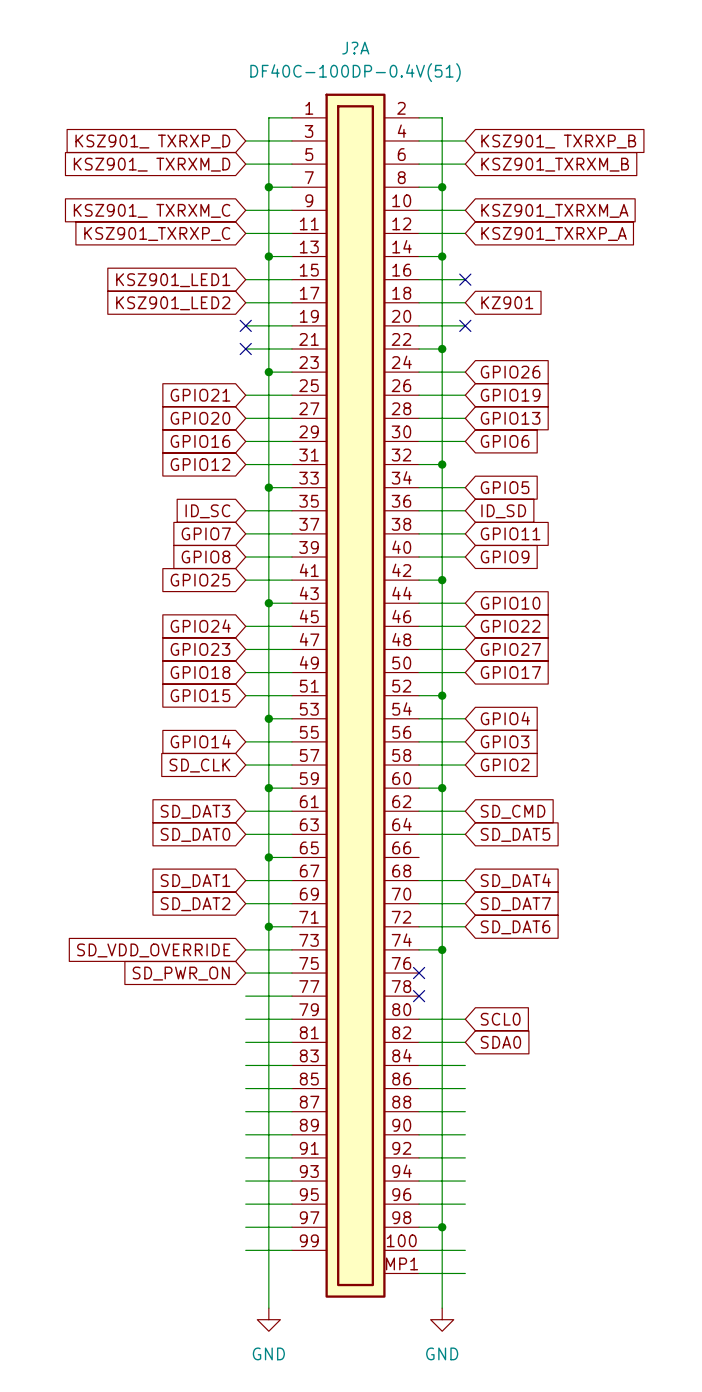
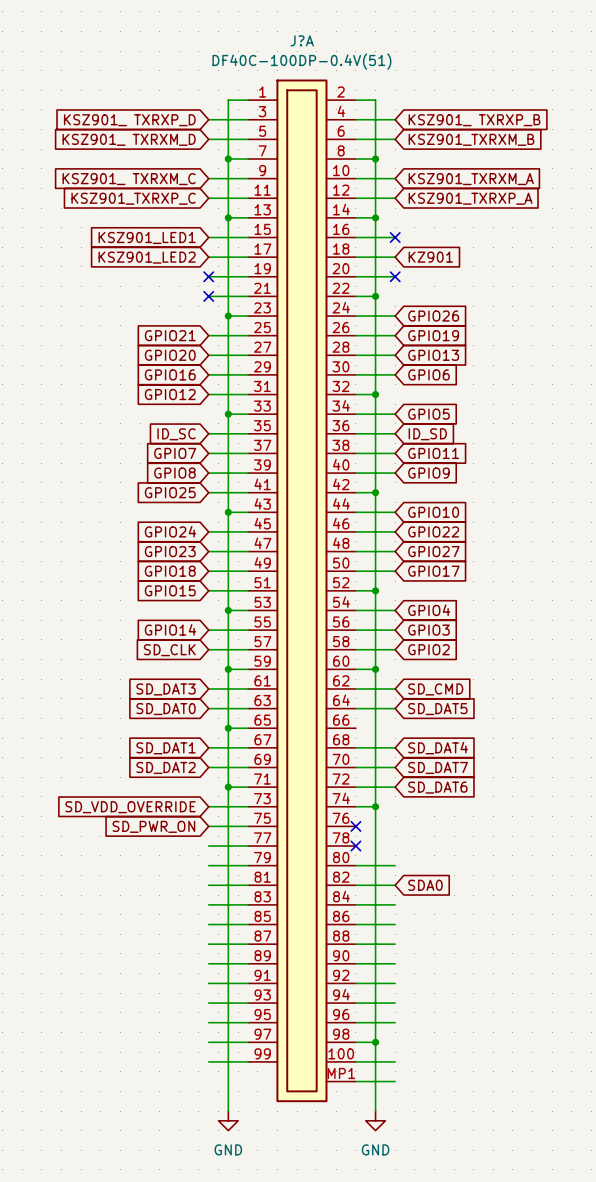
global label: SCL0 (500, 1019) -> none

